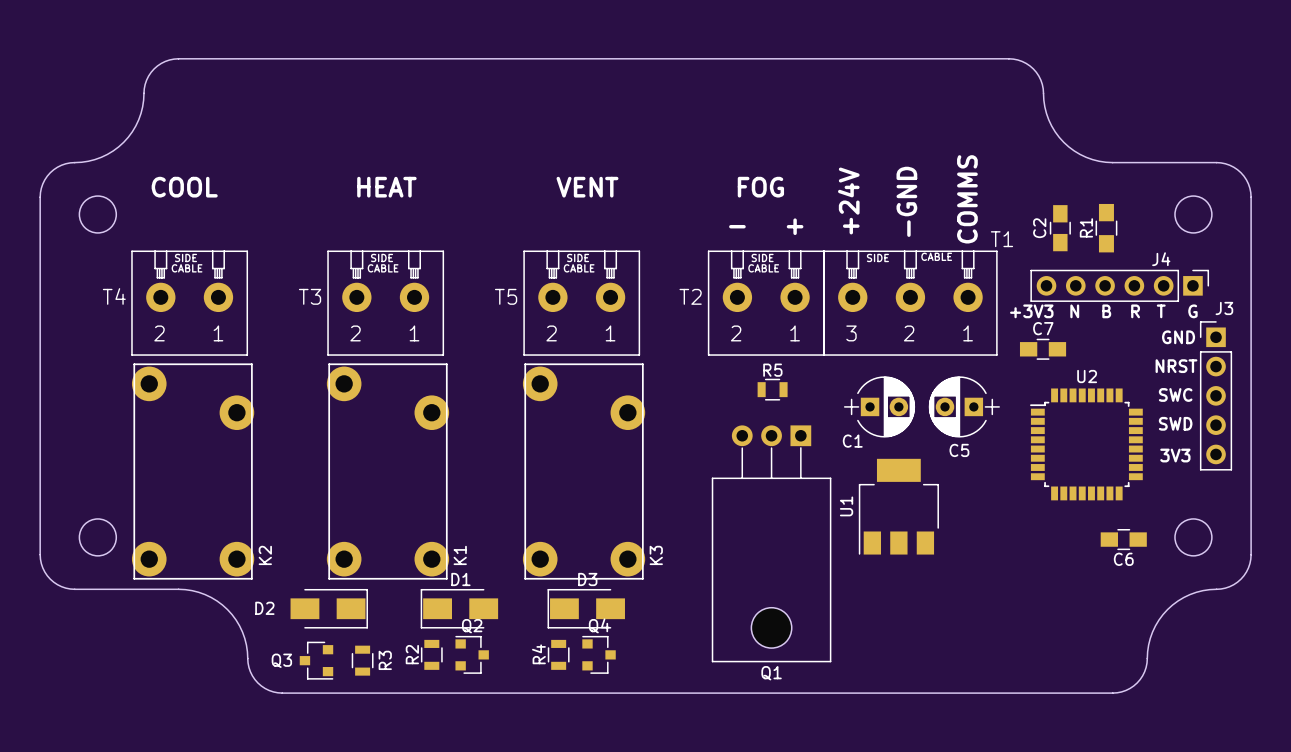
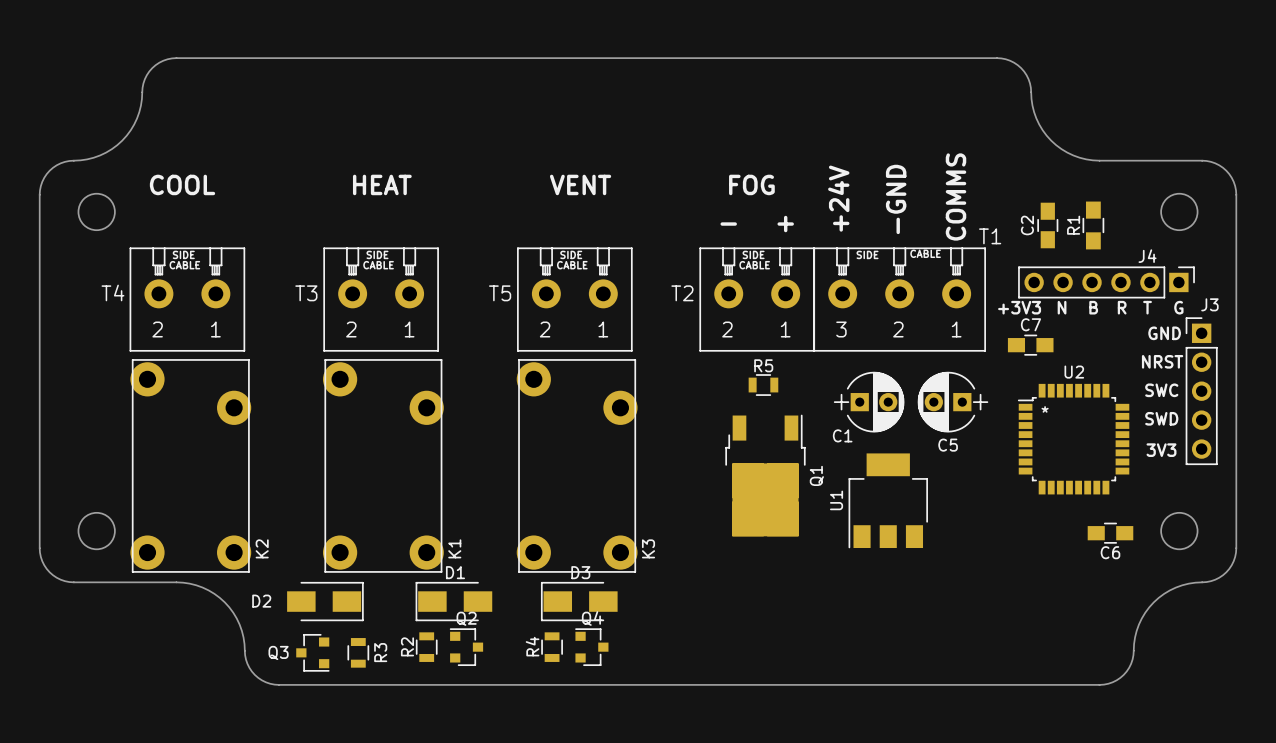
U2 text: none -> * (1045, 409)
Q1 footprint: [711, 425, 832, 663] -> [725, 414, 806, 537]
Q1 name position: Q1 (771, 673) -> Q1 (816, 475)

